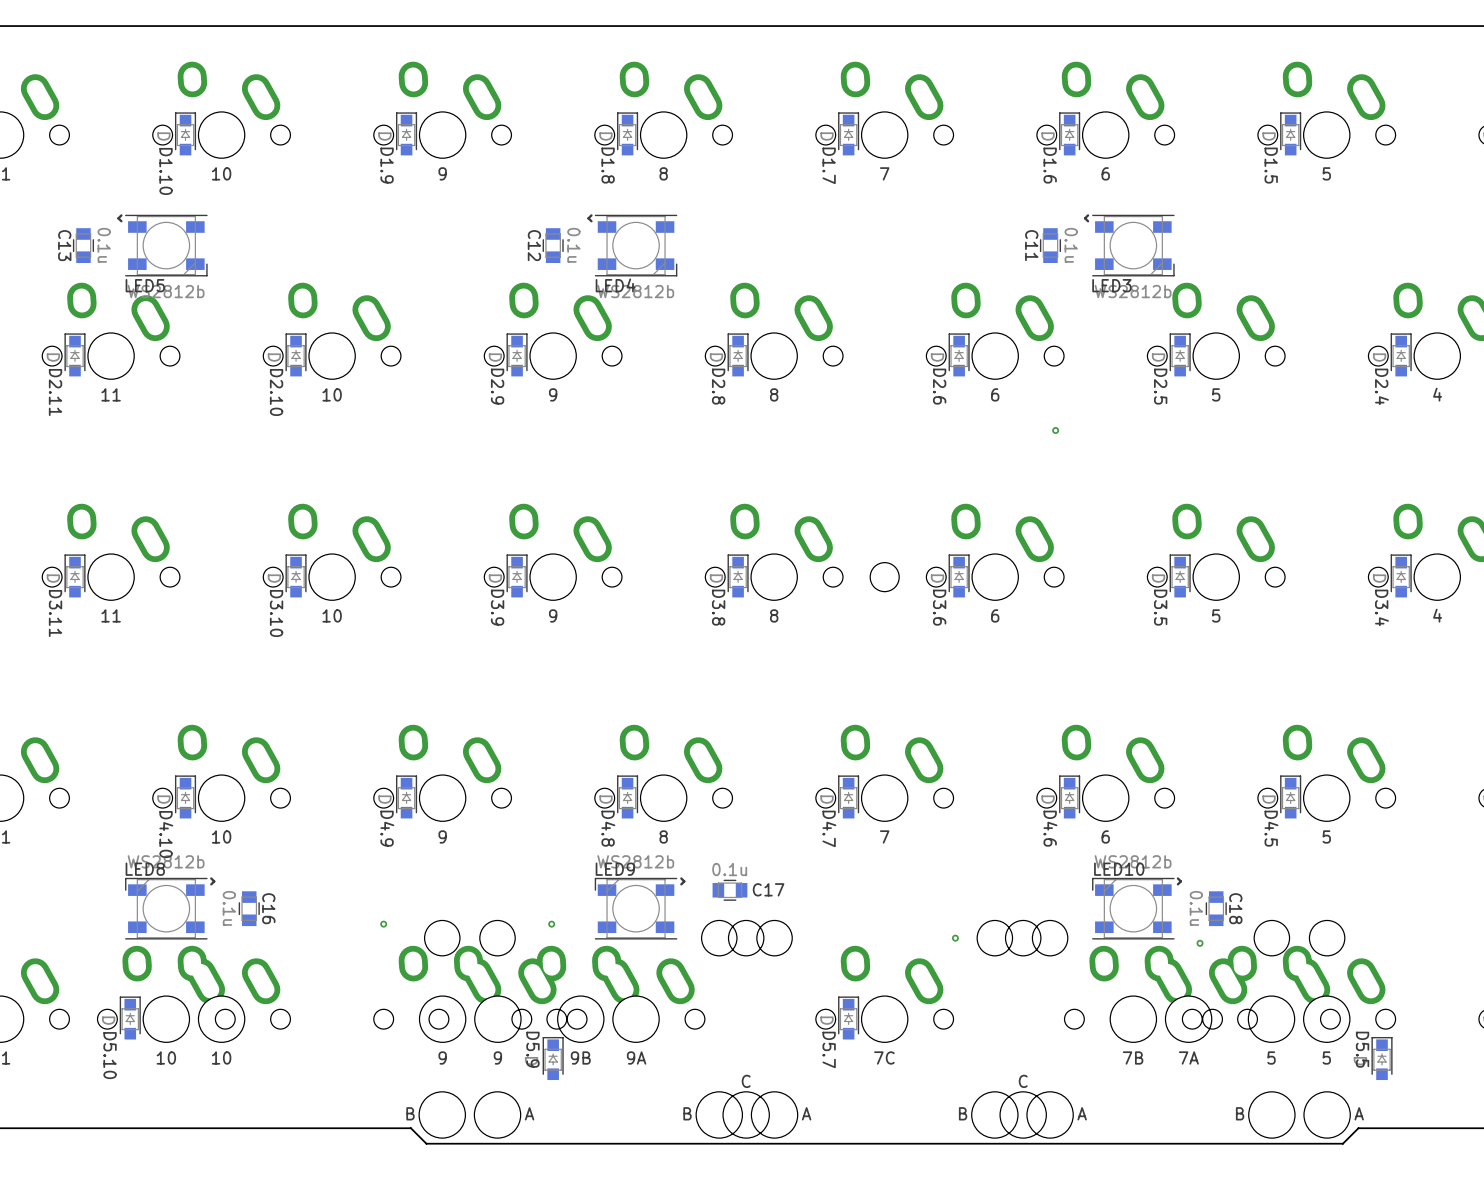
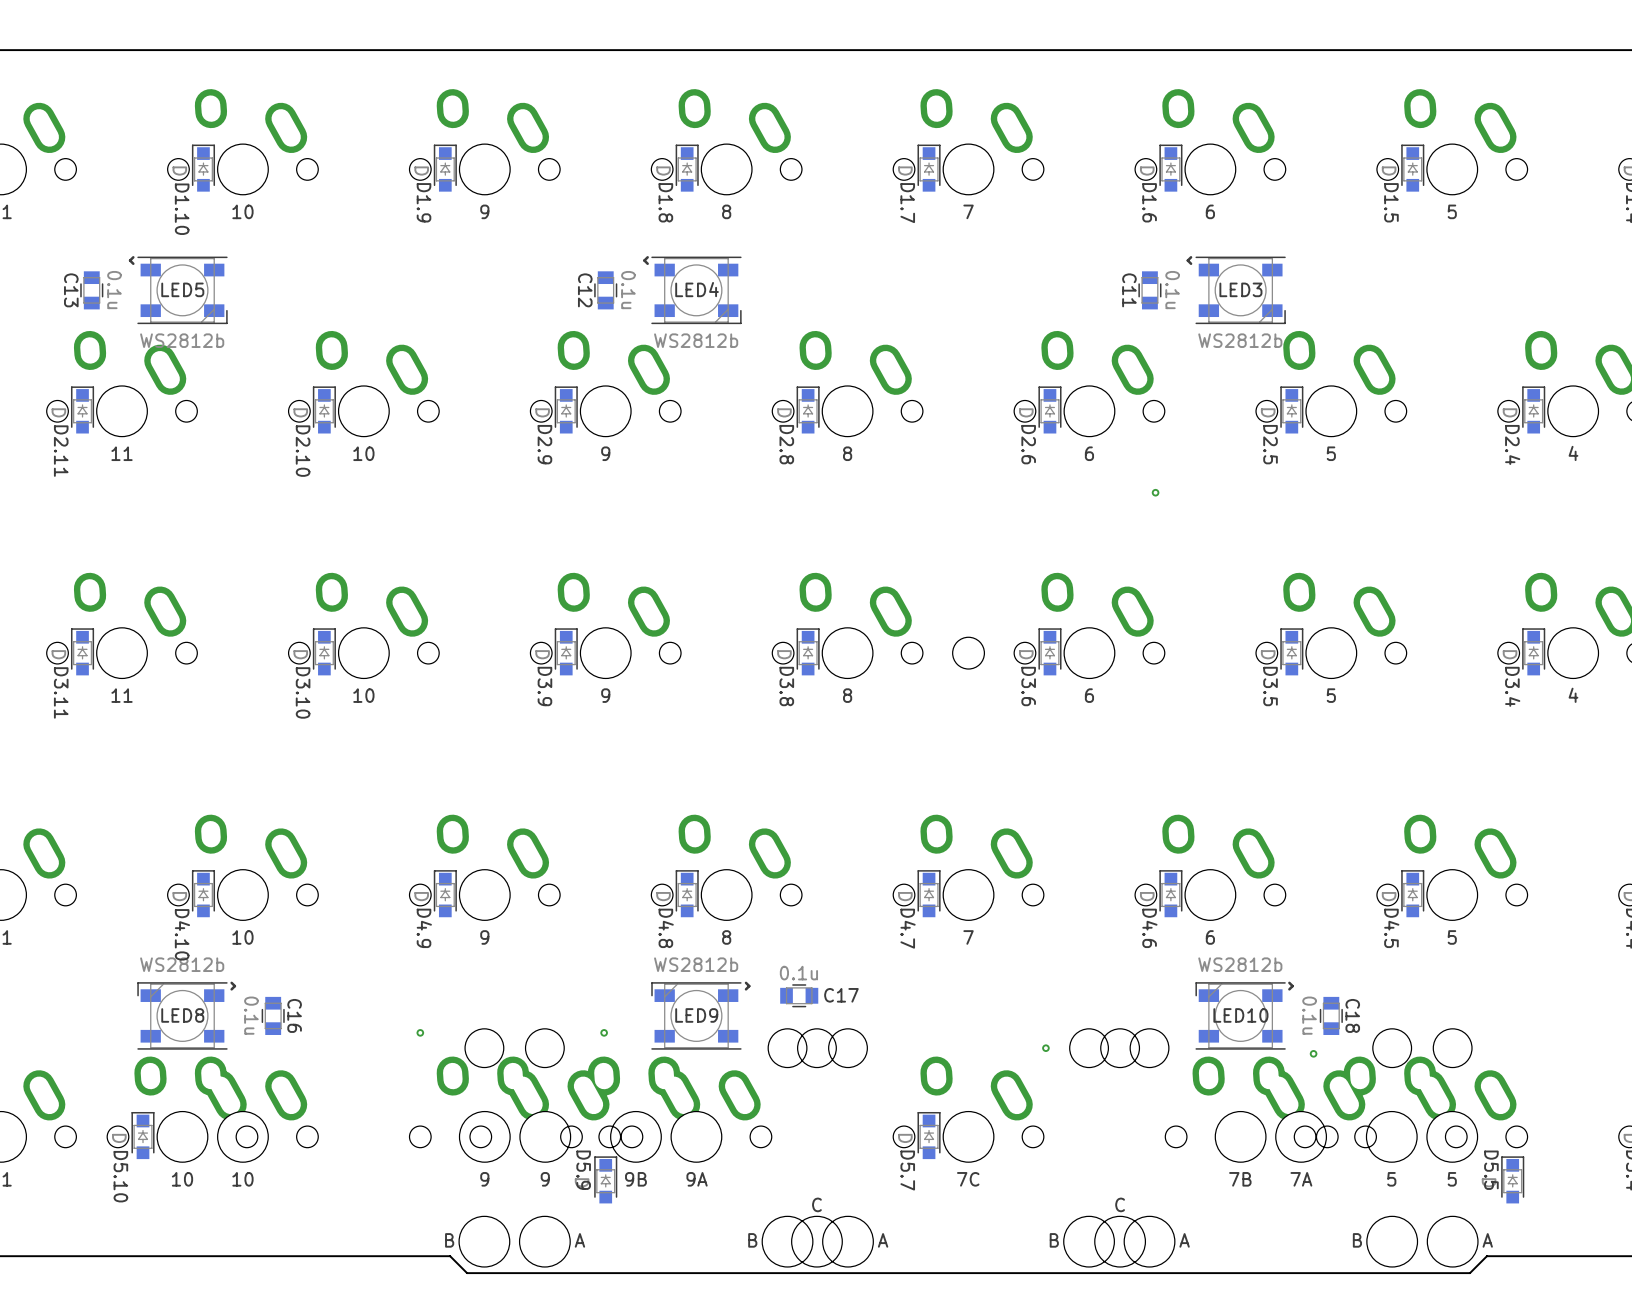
LED5 name position: LED5 (145, 285) -> LED5 (182, 289)
LED4 name position: LED4 (615, 285) -> LED4 (697, 289)
LED3 name position: LED3 (1111, 285) -> LED3 (1240, 289)
LED8 name position: LED8 (145, 869) -> LED8 (182, 1015)
LED9 name position: LED9 (615, 869) -> LED9 (696, 1015)
LED10 name position: LED10 (1119, 869) -> LED10 (1240, 1015)

